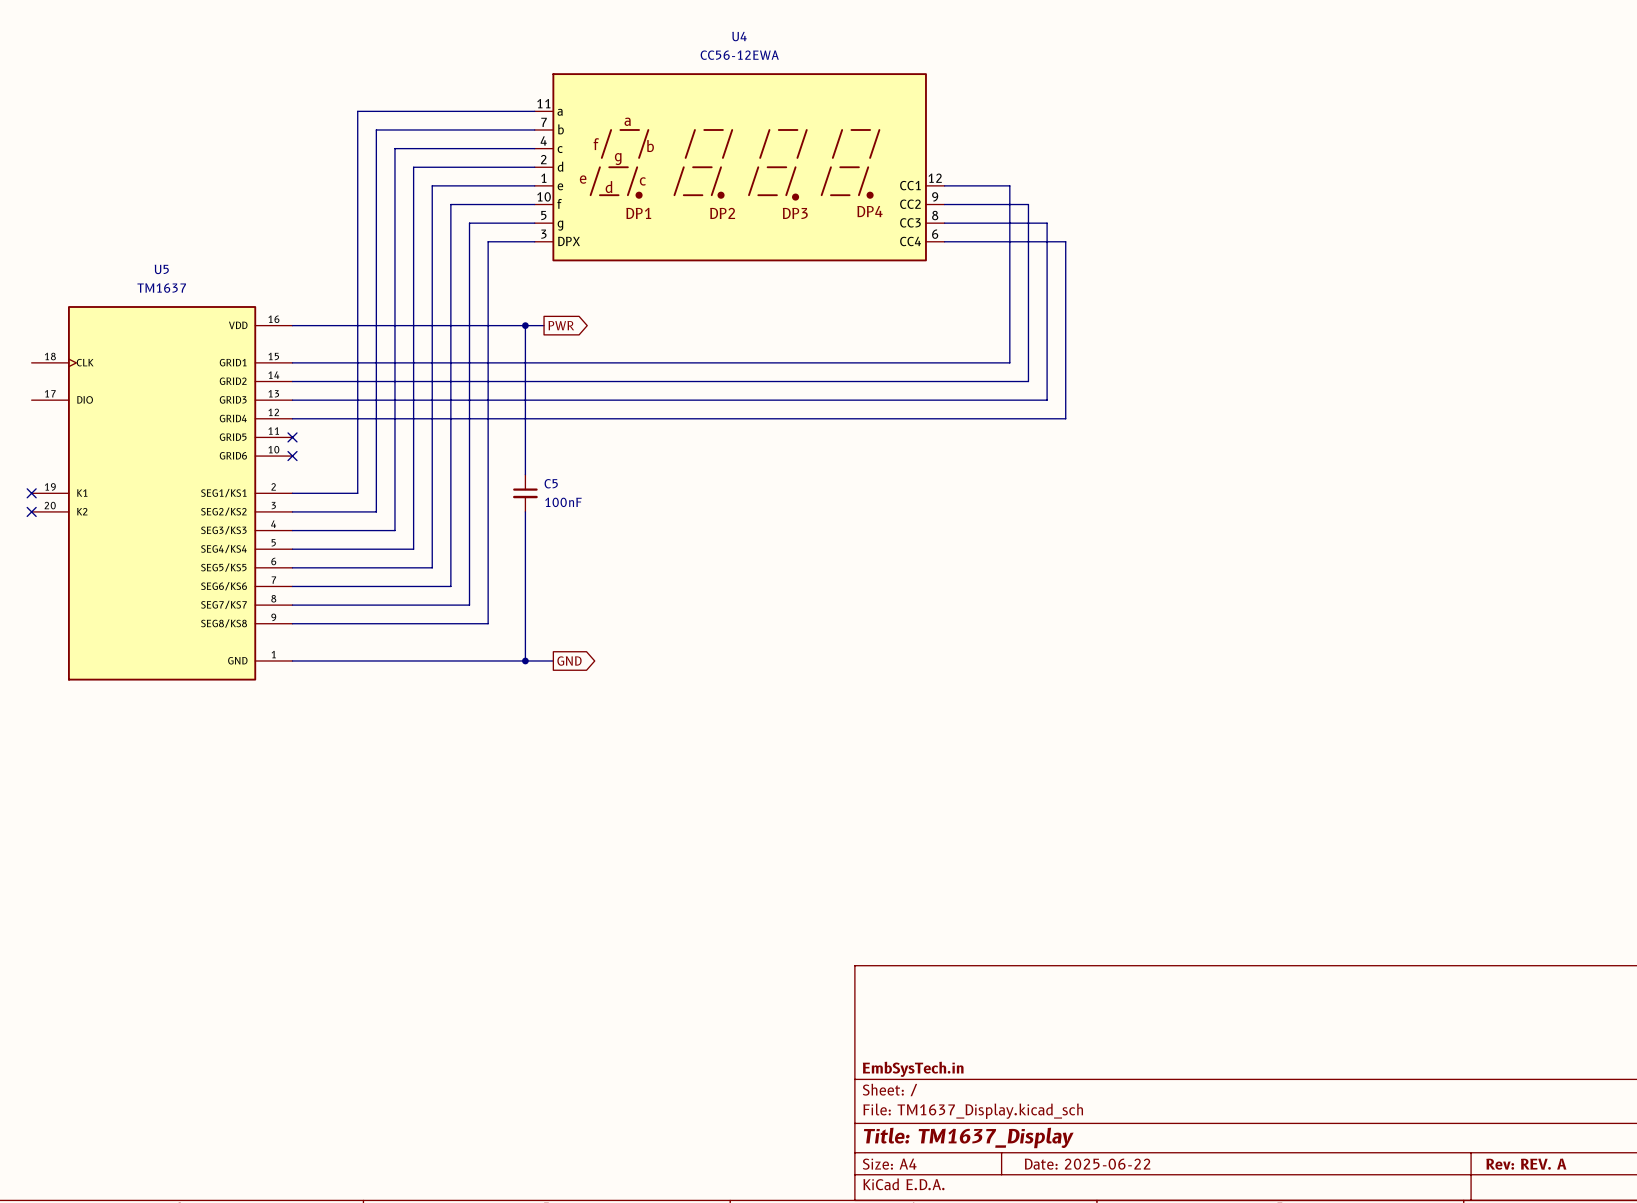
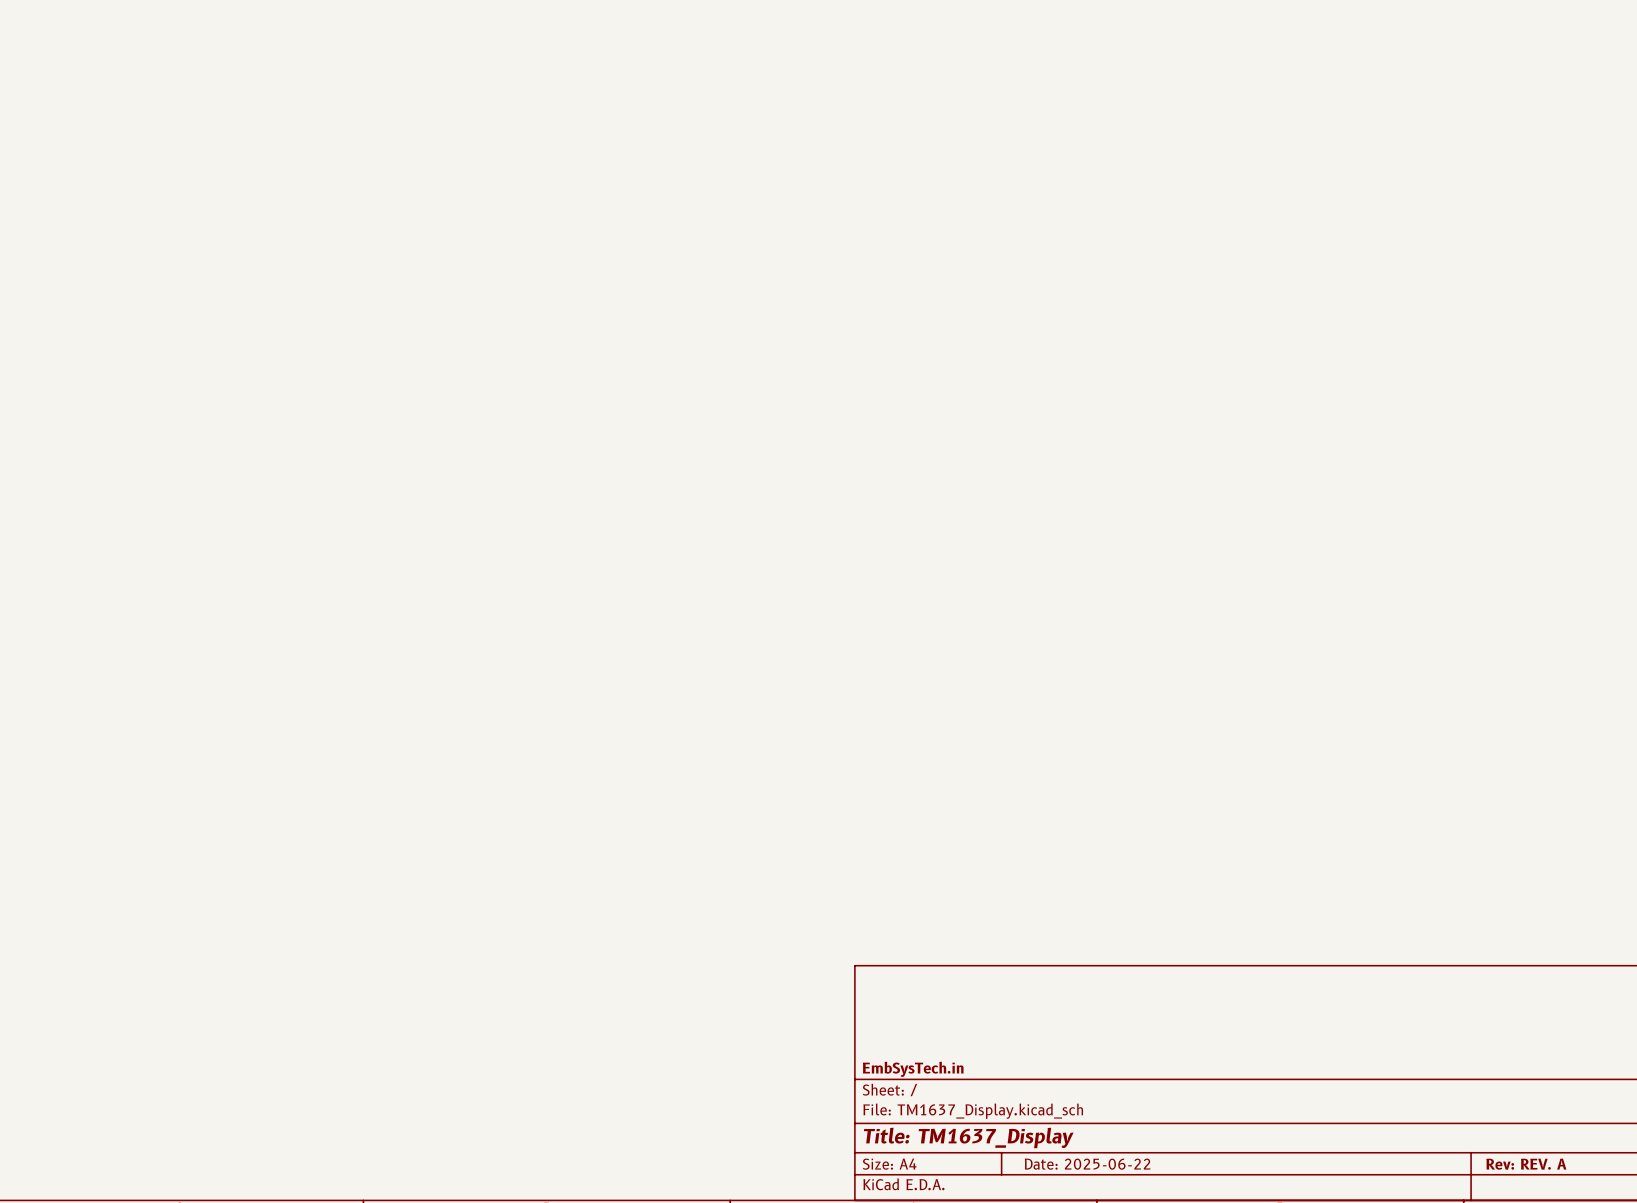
wire: (534, 111) (357, 111) (357, 493) (292, 493) -> none
wire: (534, 129) (376, 129) (376, 511) (292, 511) -> none
wire: (534, 148) (394, 148) (394, 530) (292, 530) -> none
wire: (534, 167) (413, 167) (413, 549) (292, 549) -> none
U4: CC56-12EWA (739, 167) -> none
wire: (534, 185) (432, 185) (432, 567) (292, 567) -> none
wire: (944, 185) (1009, 185) (1009, 362) (292, 362) -> none
wire: (534, 204) (450, 204) (450, 586) (292, 586) -> none
wire: (944, 204) (1028, 204) (1028, 381) (292, 381) -> none
wire: (534, 223) (469, 223) (469, 605) (292, 605) -> none
wire: (944, 223) (1047, 223) (1047, 400) (292, 400) -> none
wire: (534, 241) (488, 241) (488, 623) (292, 623) -> none
wire: (944, 241) (1065, 241) (1065, 418) (292, 418) -> none
wire: (292, 325) (544, 325) -> none
wire: (525, 325) (525, 474) -> none
junction: (525, 325) -> none
global label: PWR (561, 325) -> none
no-connect mark: (292, 437) -> none
no-connect mark: (292, 456) -> none
no-connect mark: (31, 493) -> none
U5: TM1637 (162, 493) -> none
C5: 100nF (525, 493) -> none
no-connect mark: (31, 511) -> none
wire: (525, 511) (525, 660) -> none
wire: (292, 660) (553, 660) -> none
junction: (525, 660) -> none
global label: GND (569, 661) -> none

